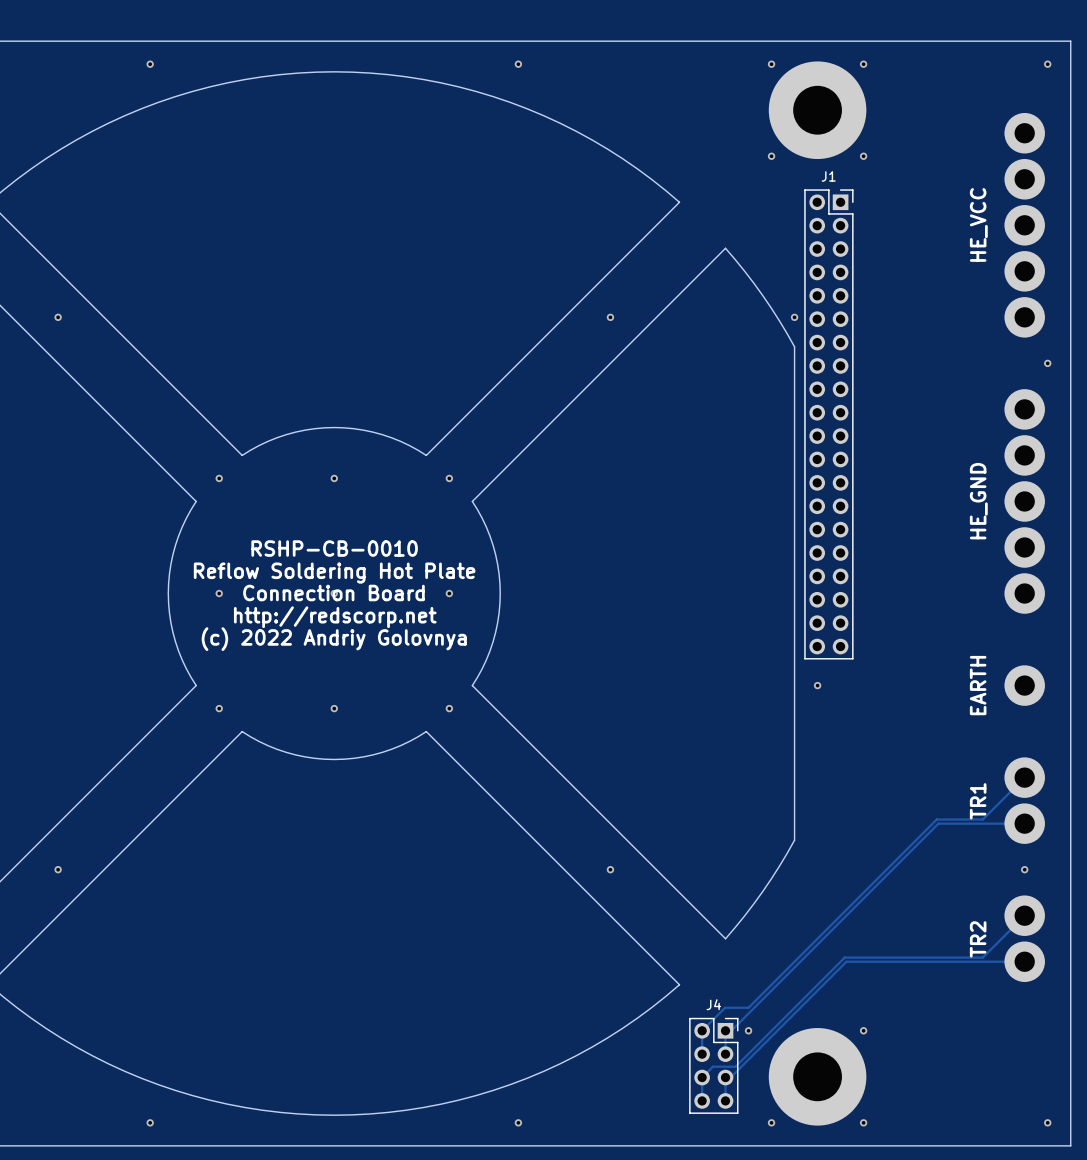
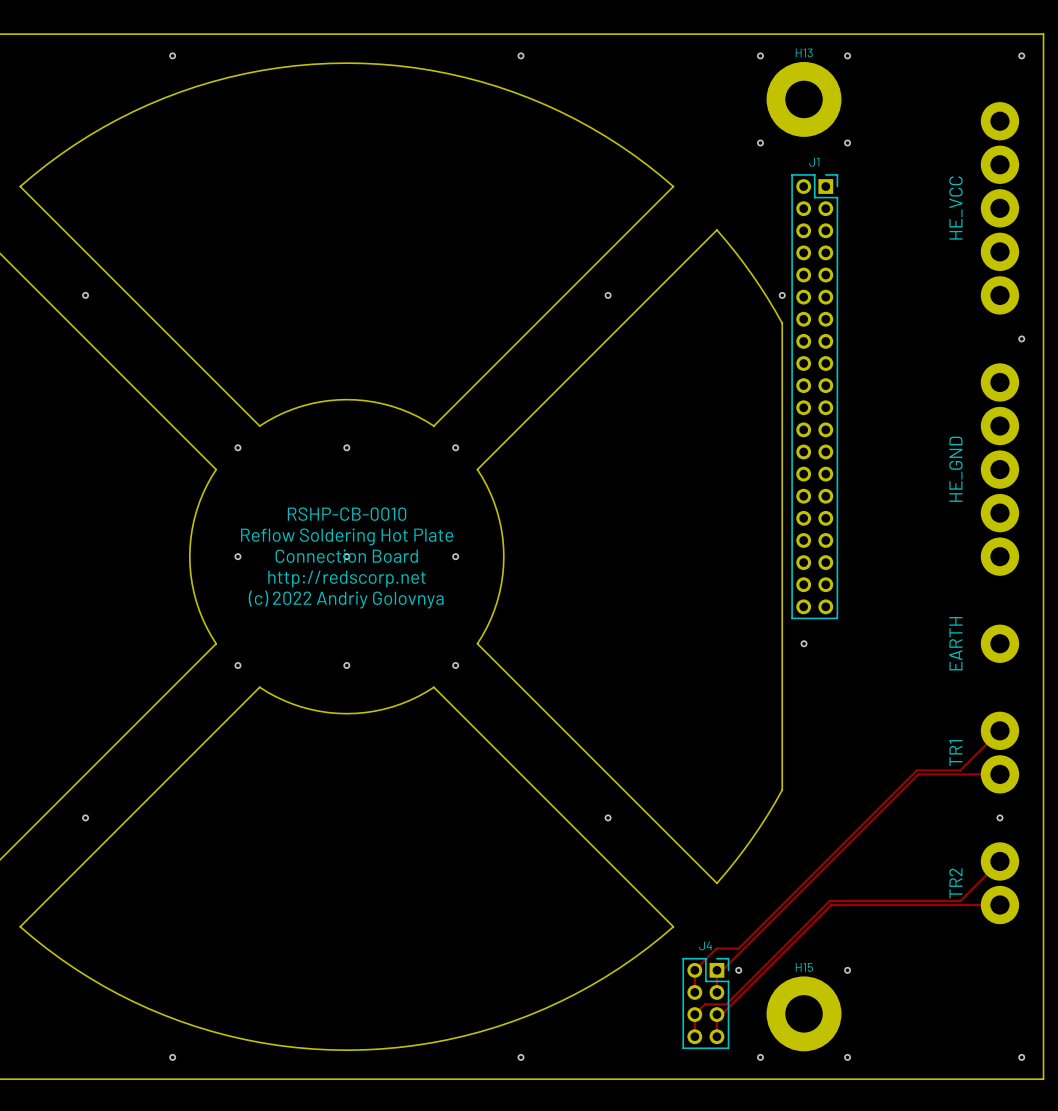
part: (817, 110) -> none
H13: none -> (804, 99)
part: (817, 1076) -> none
H15: none -> (804, 1013)

